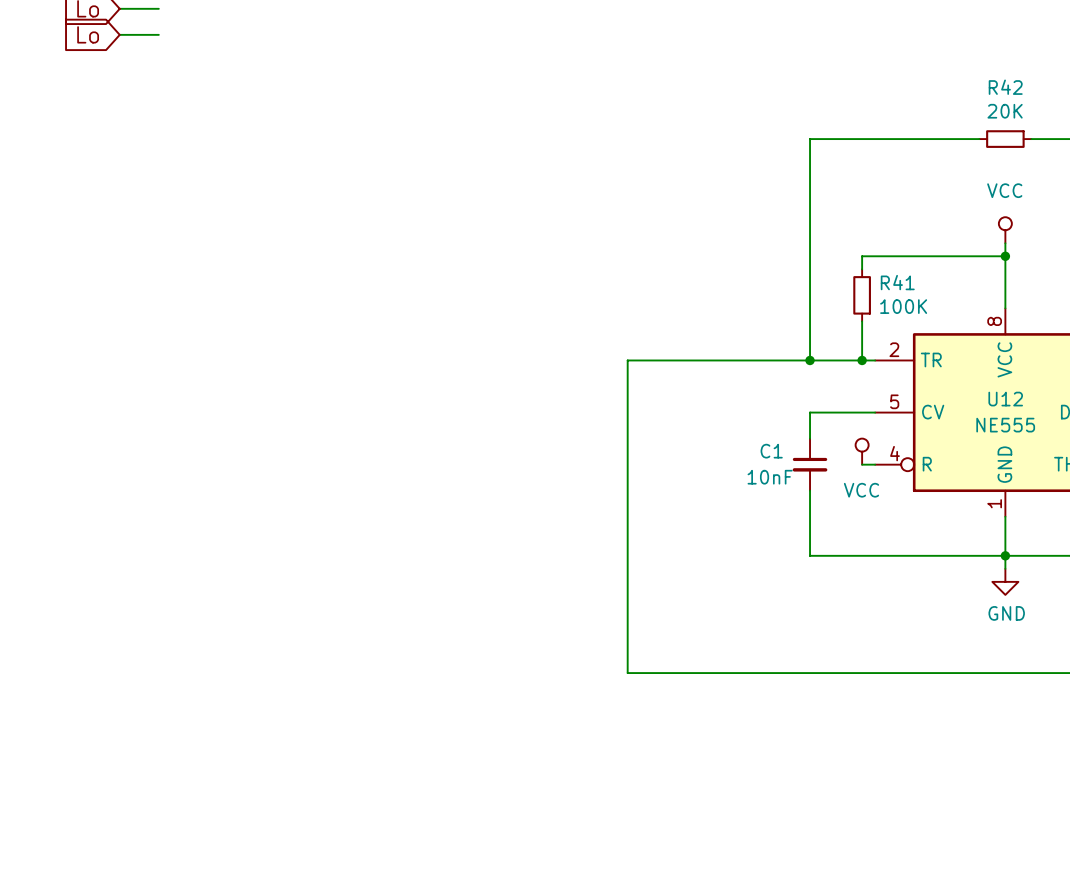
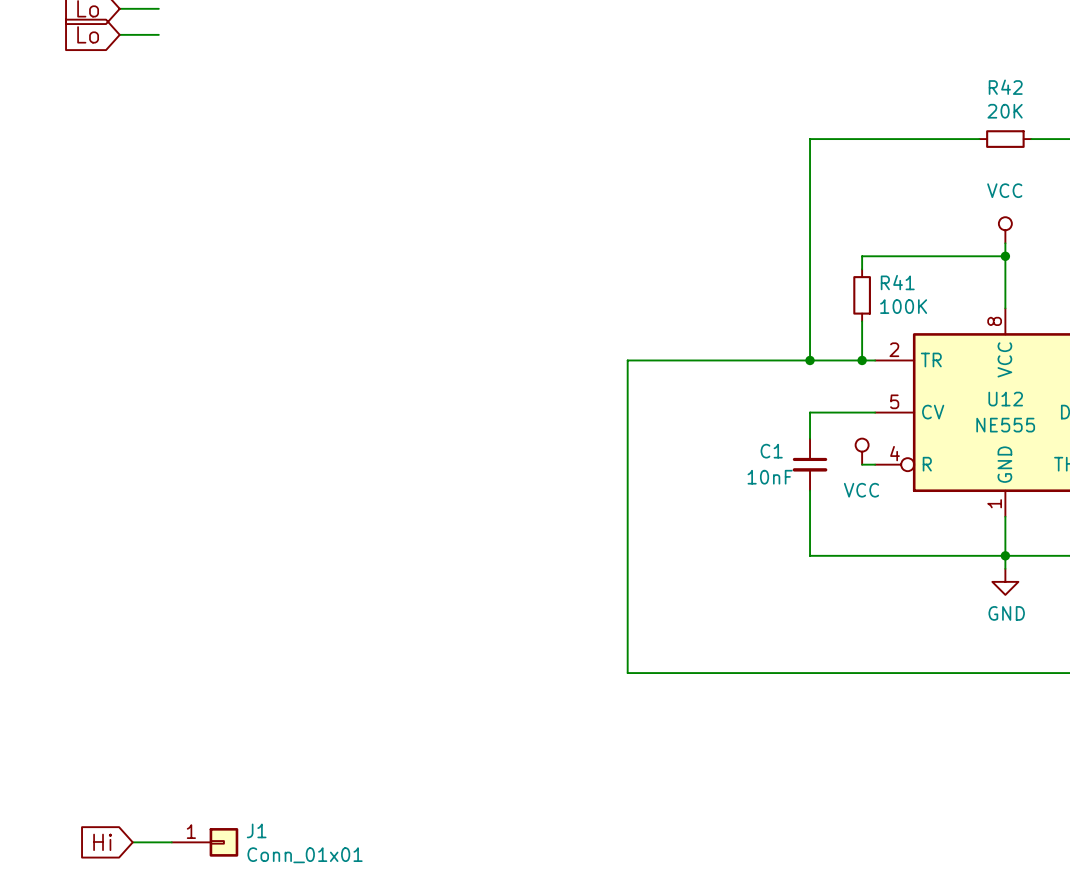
global label: none -> Hi (102, 842)
wire: none -> (132, 842) (171, 842)
J1: none -> Conn_01x01 (205, 842)

